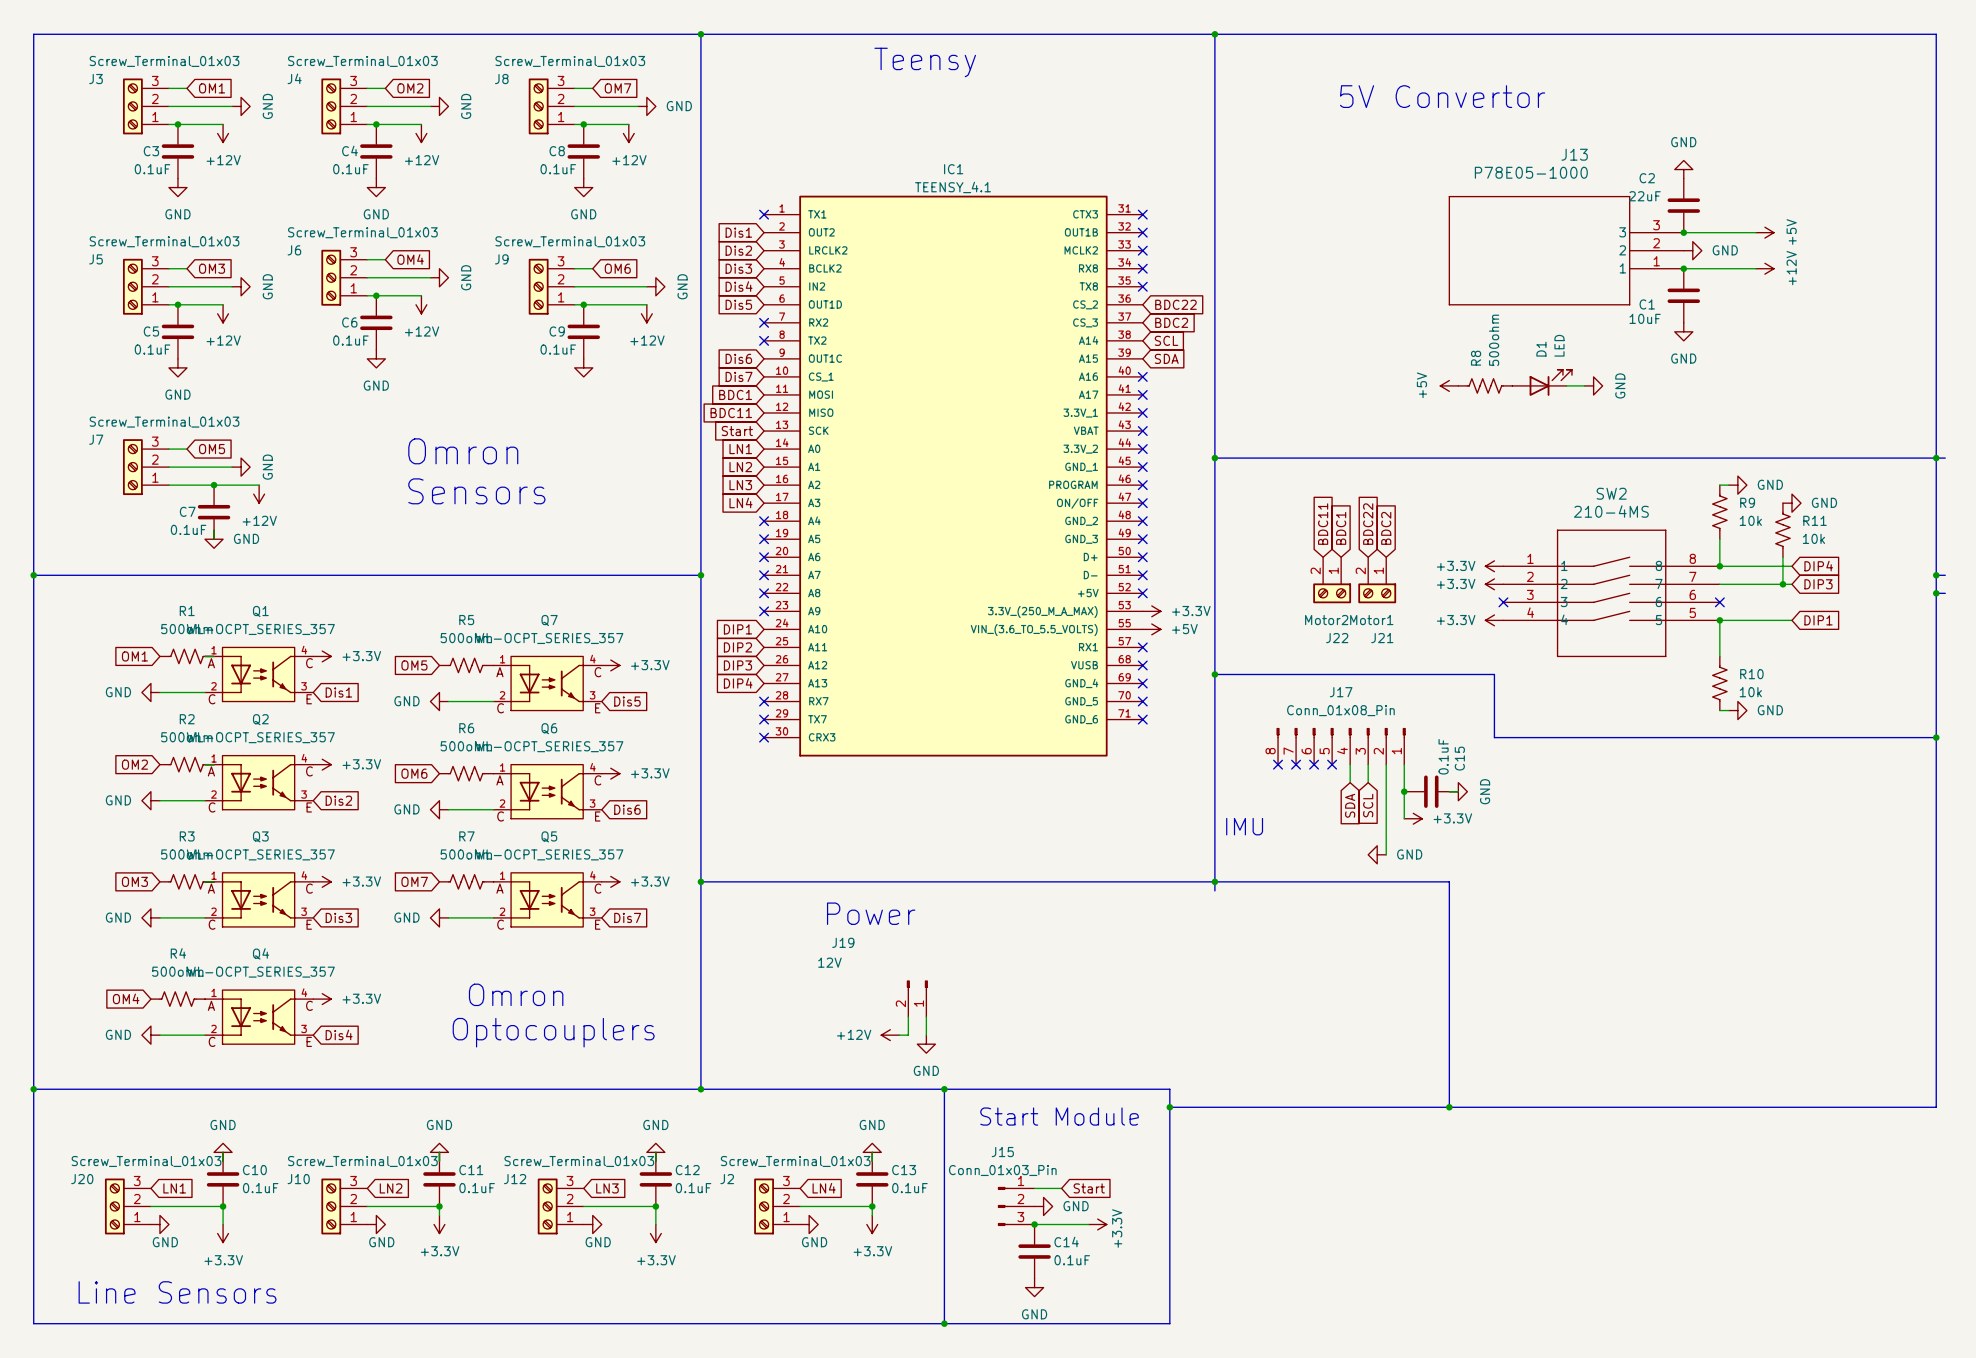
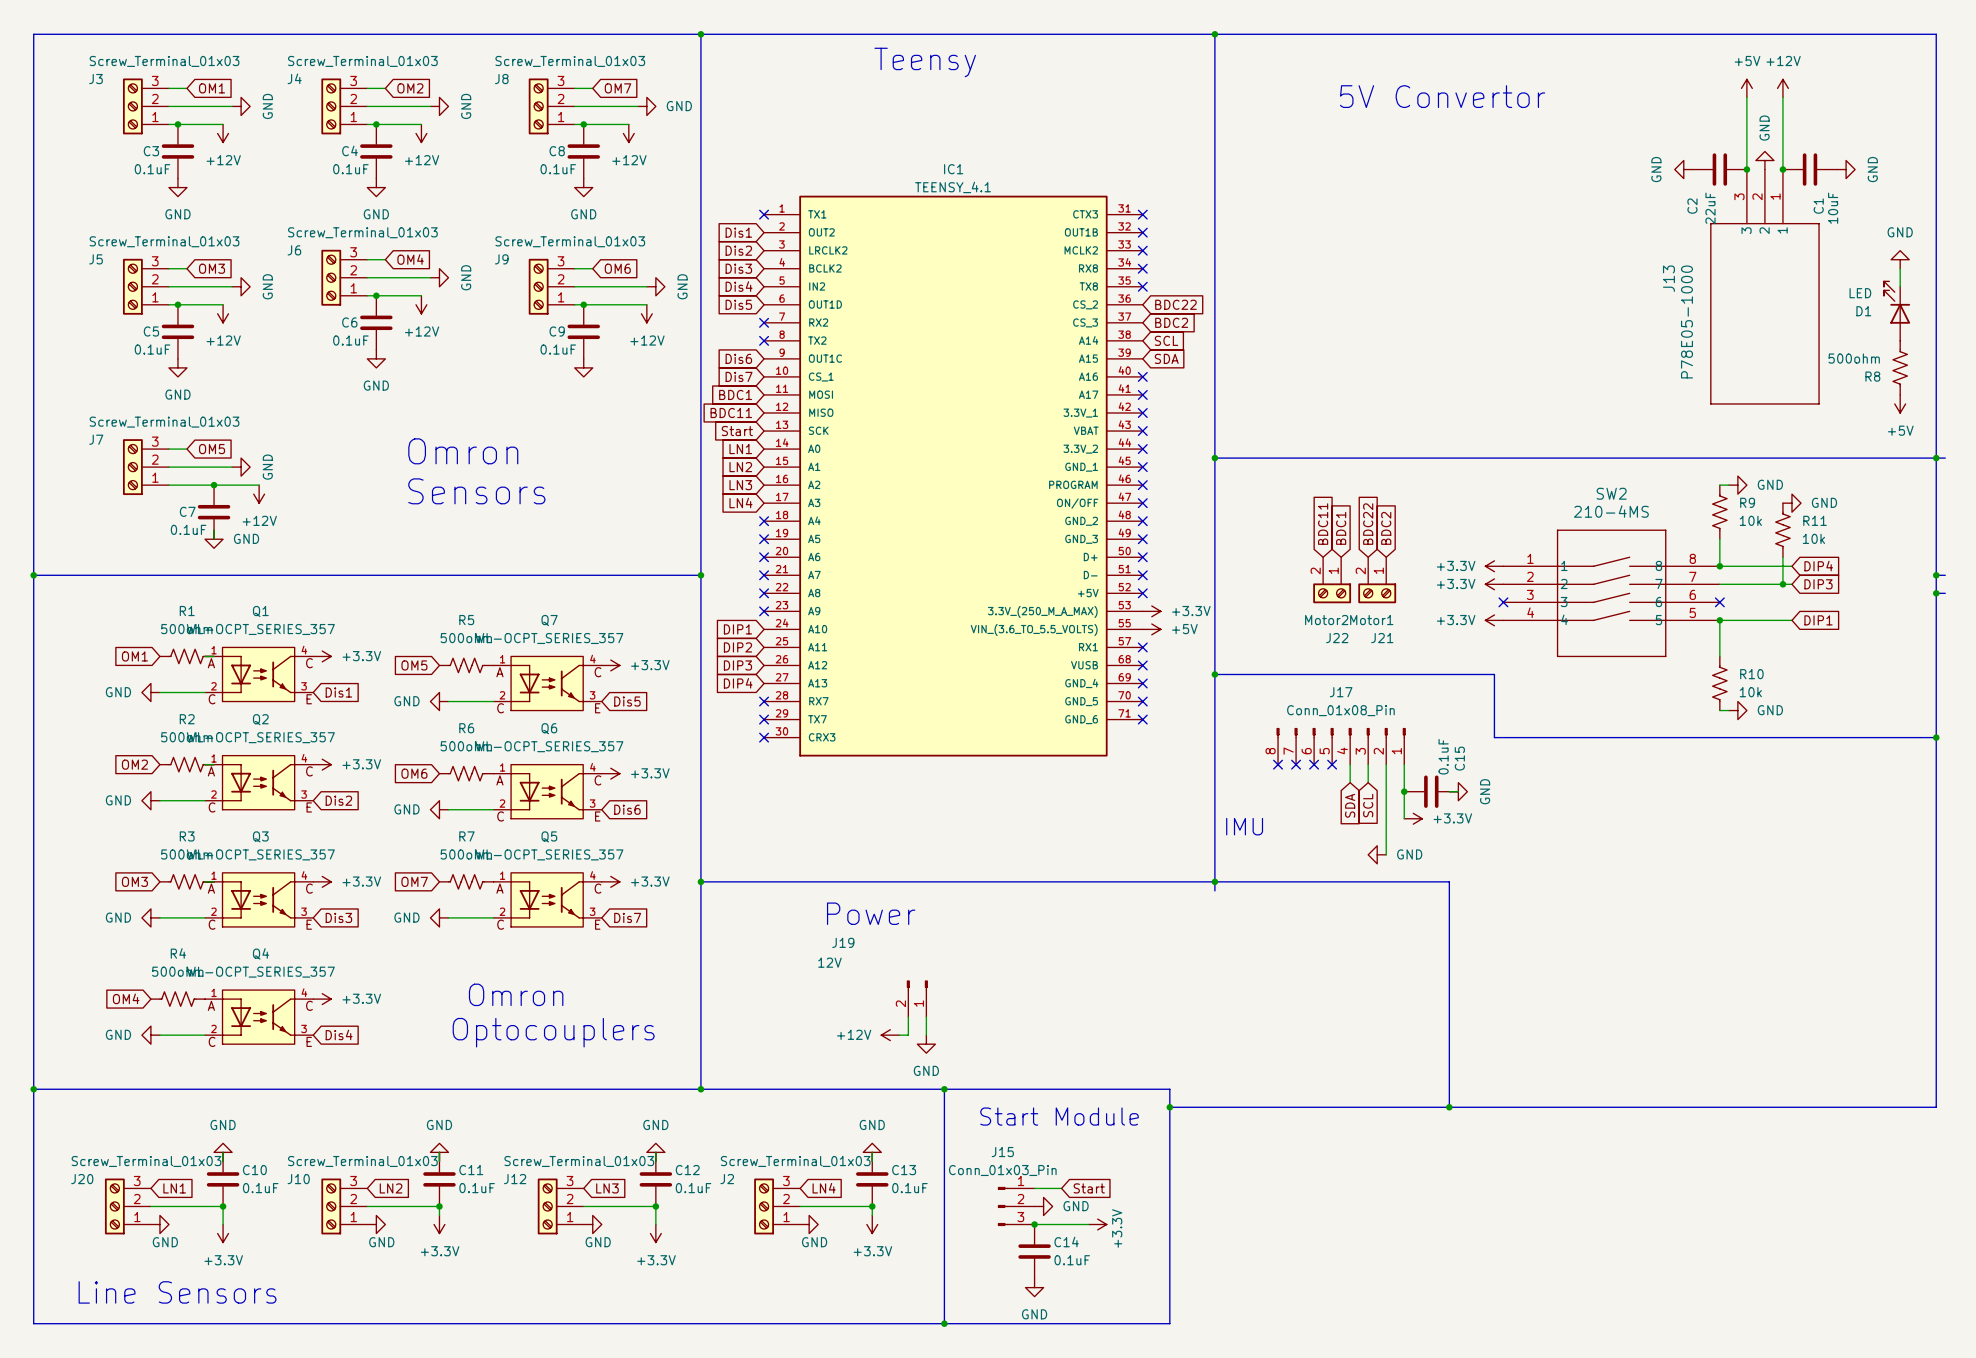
power symbol: none -> +5V (1746, 88)
power symbol: none -> +12V (1782, 88)
wire: none -> (1746, 97) (1746, 169)
wire: none -> (1782, 97) (1782, 169)
power symbol: none -> GND (1764, 160)
power symbol rotation: 0° (1683, 169) -> 90° counterclockwise (1683, 169)
junction: none -> (1746, 169)
junction: none -> (1782, 169)
power symbol: none -> GND (1846, 169)
C2 name position: C2 (1647, 178) -> C2 (1692, 206)
C2 value position: 22uF (1644, 196) -> 22uF (1710, 208)
C2 rotation: 0° (1683, 205) -> 90° clockwise (1719, 169)
C2 position: (1683, 205) -> (1719, 169)
wire: (1683, 232) (1755, 232) -> none
junction: (1683, 232) -> none
power symbol: +5V (1764, 232) -> none
J13 rotation: 0° (1539, 250) -> 90° counterclockwise (1764, 313)
J13 position: (1566, 250) -> (1764, 286)
power symbol: GND (1692, 250) -> none
power symbol: none -> GND (1900, 259)
wire: (1683, 268) (1755, 268) -> none
junction: (1683, 268) -> none
power symbol: +12V (1764, 268) -> none
wire: none -> (1900, 268) (1900, 286)
C1 rotation: 0° (1683, 295) -> 90° clockwise (1810, 169)
C1 position: (1683, 295) -> (1810, 169)
C1 name position: C1 (1647, 304) -> C1 (1818, 206)
C1 value position: 10uF (1645, 318) -> 10uF (1833, 208)
power symbol: GND (1683, 331) -> none
R8 value position: 500ohm (1494, 340) -> 500ohm (1854, 358)
R8 name position: R8 (1476, 358) -> R8 (1872, 376)
D1 position: (1542, 382) -> (1897, 311)
D1 rotation: 0° (1550, 382) -> 90° counterclockwise (1897, 302)
power symbol: +5V (1449, 385) -> none
R8 rotation: 0° (1485, 385) -> 90° clockwise (1900, 367)
R8 position: (1485, 385) -> (1900, 367)
wire: (1566, 385) (1584, 385) -> none
power symbol: GND (1593, 385) -> none
power symbol: none -> +5V (1900, 403)

